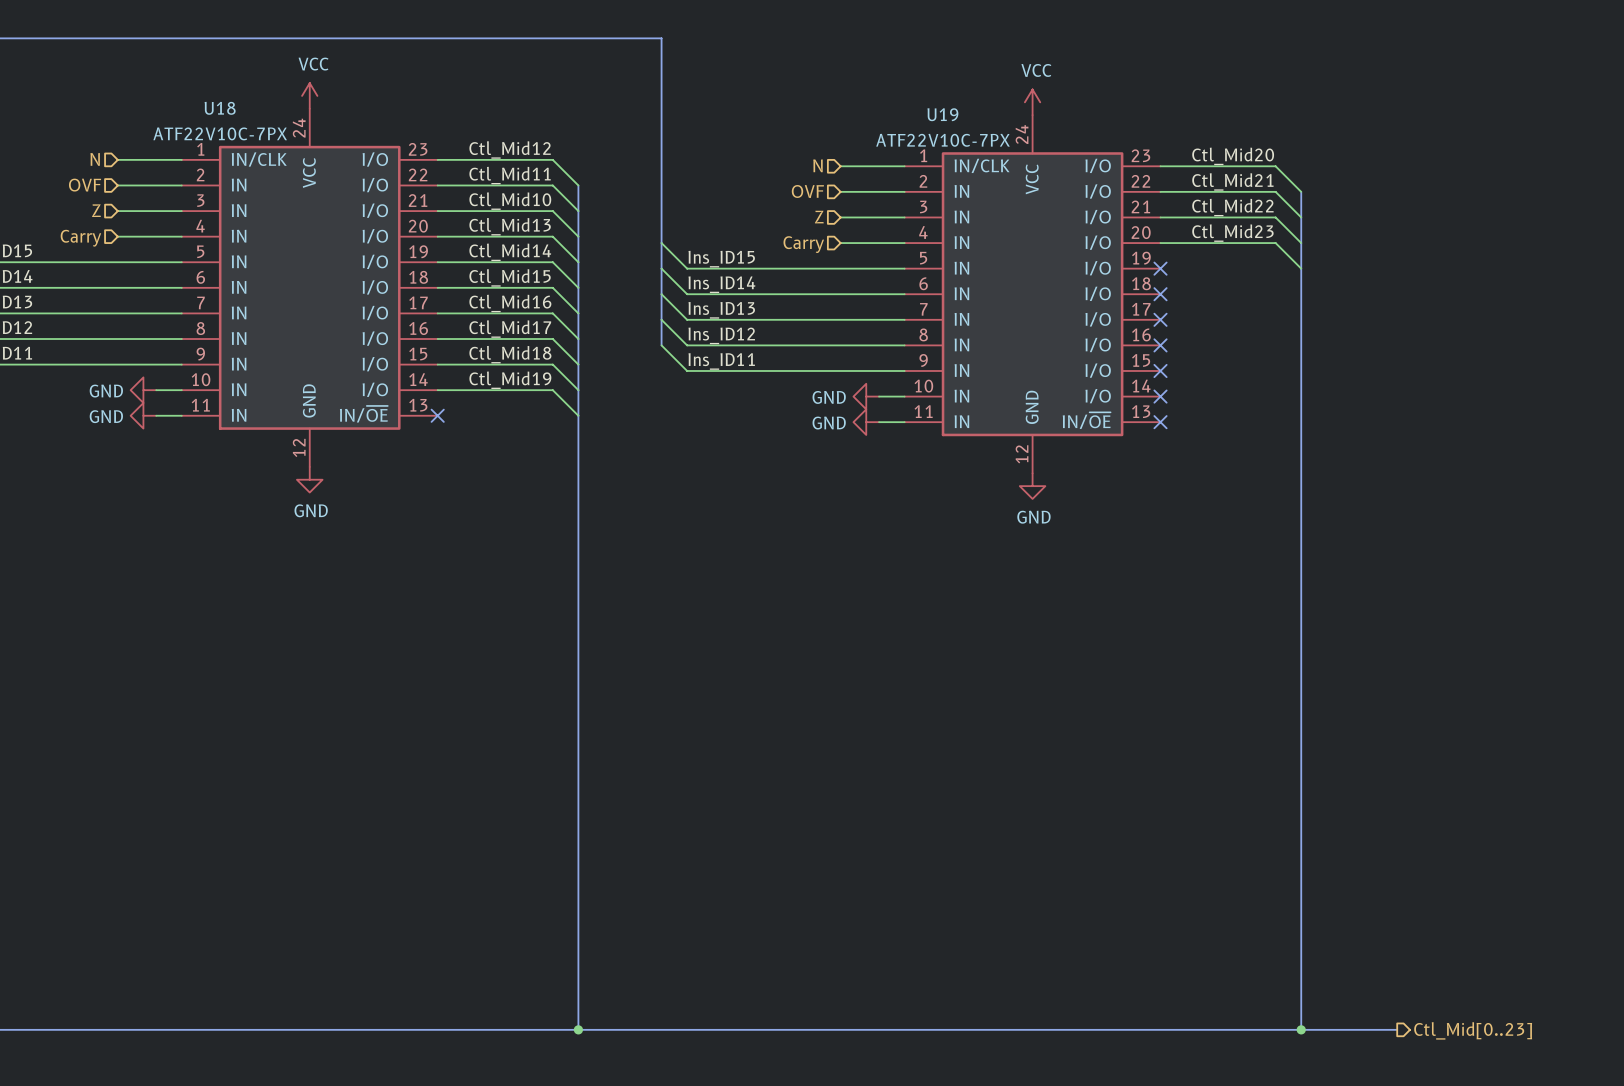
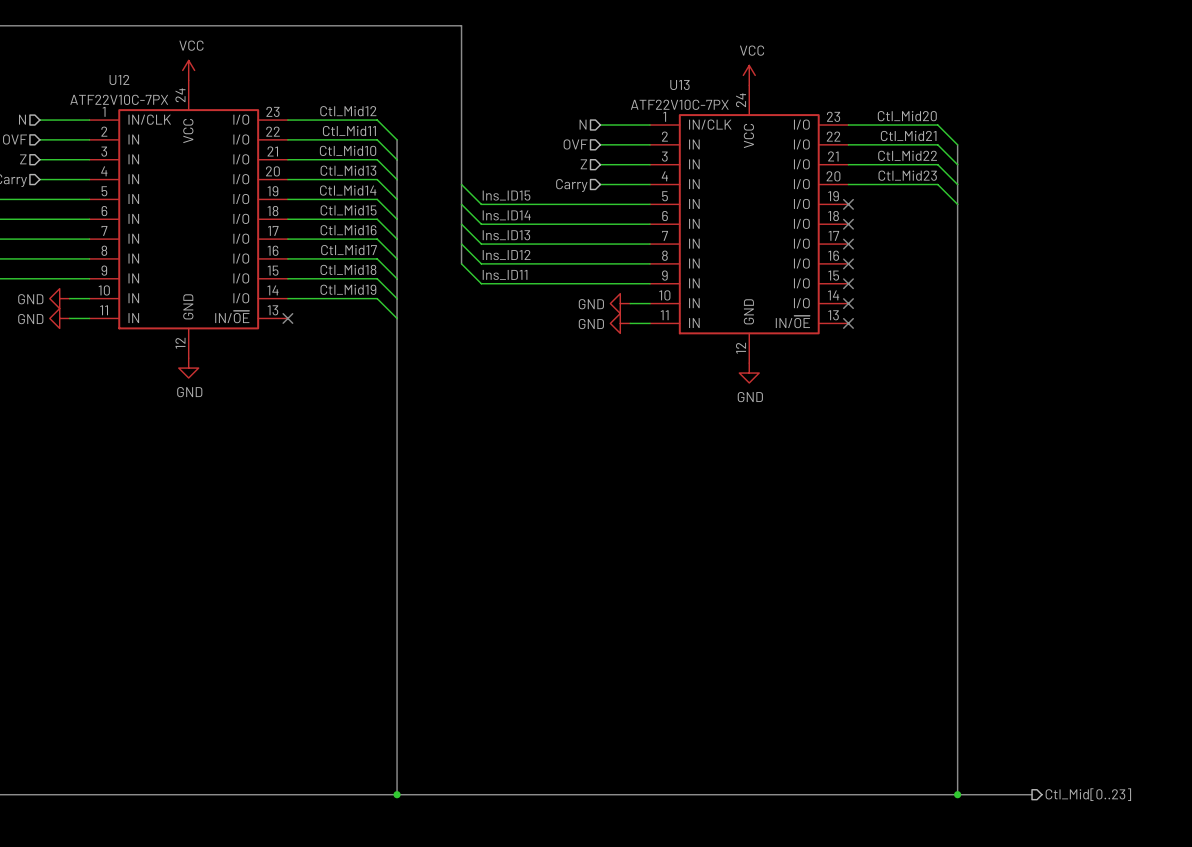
U18 name: U18 (220, 108) -> U12 (119, 79)
U19 name: U19 (942, 114) -> U13 (679, 84)

